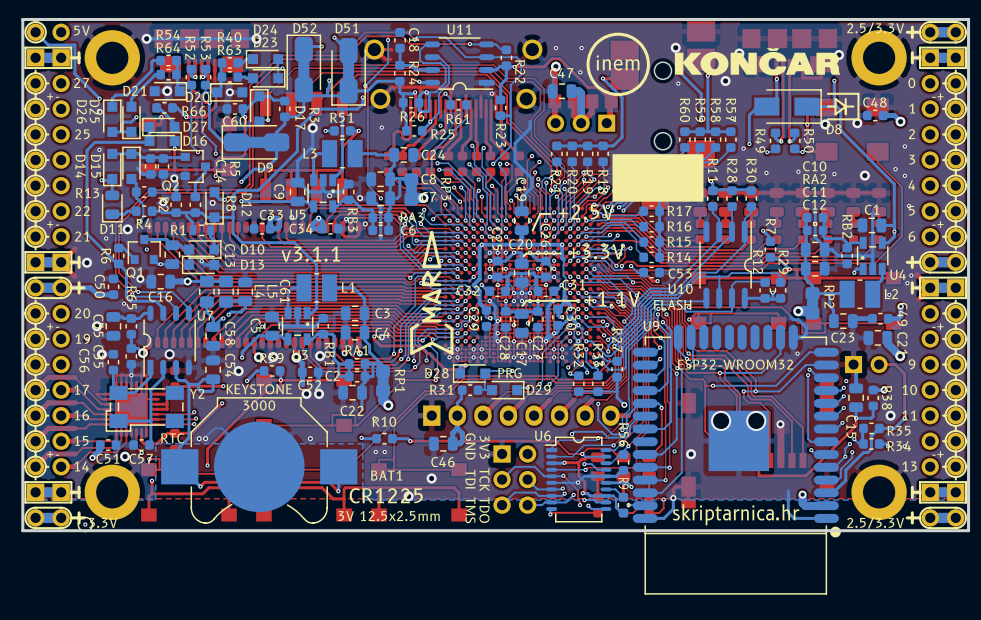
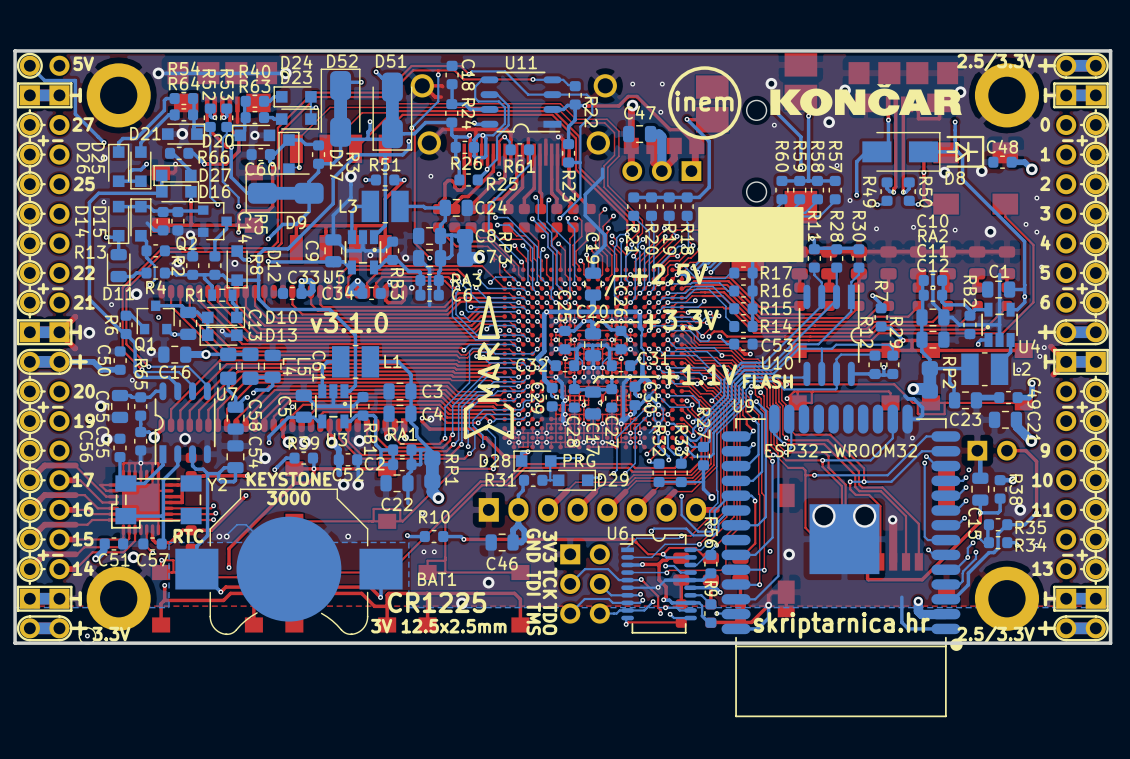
text: v3.1.1 (310, 254) -> v3.1.0 (349, 322)
top track: (636, 496) (636, 509) (632, 513) (623, 513) -> none
top track: none -> (768, 605) (751, 622) (714, 622)
top track: (663, 499) (663, 508) (659, 513) (649, 513) -> none
via: (663, 499) -> none

